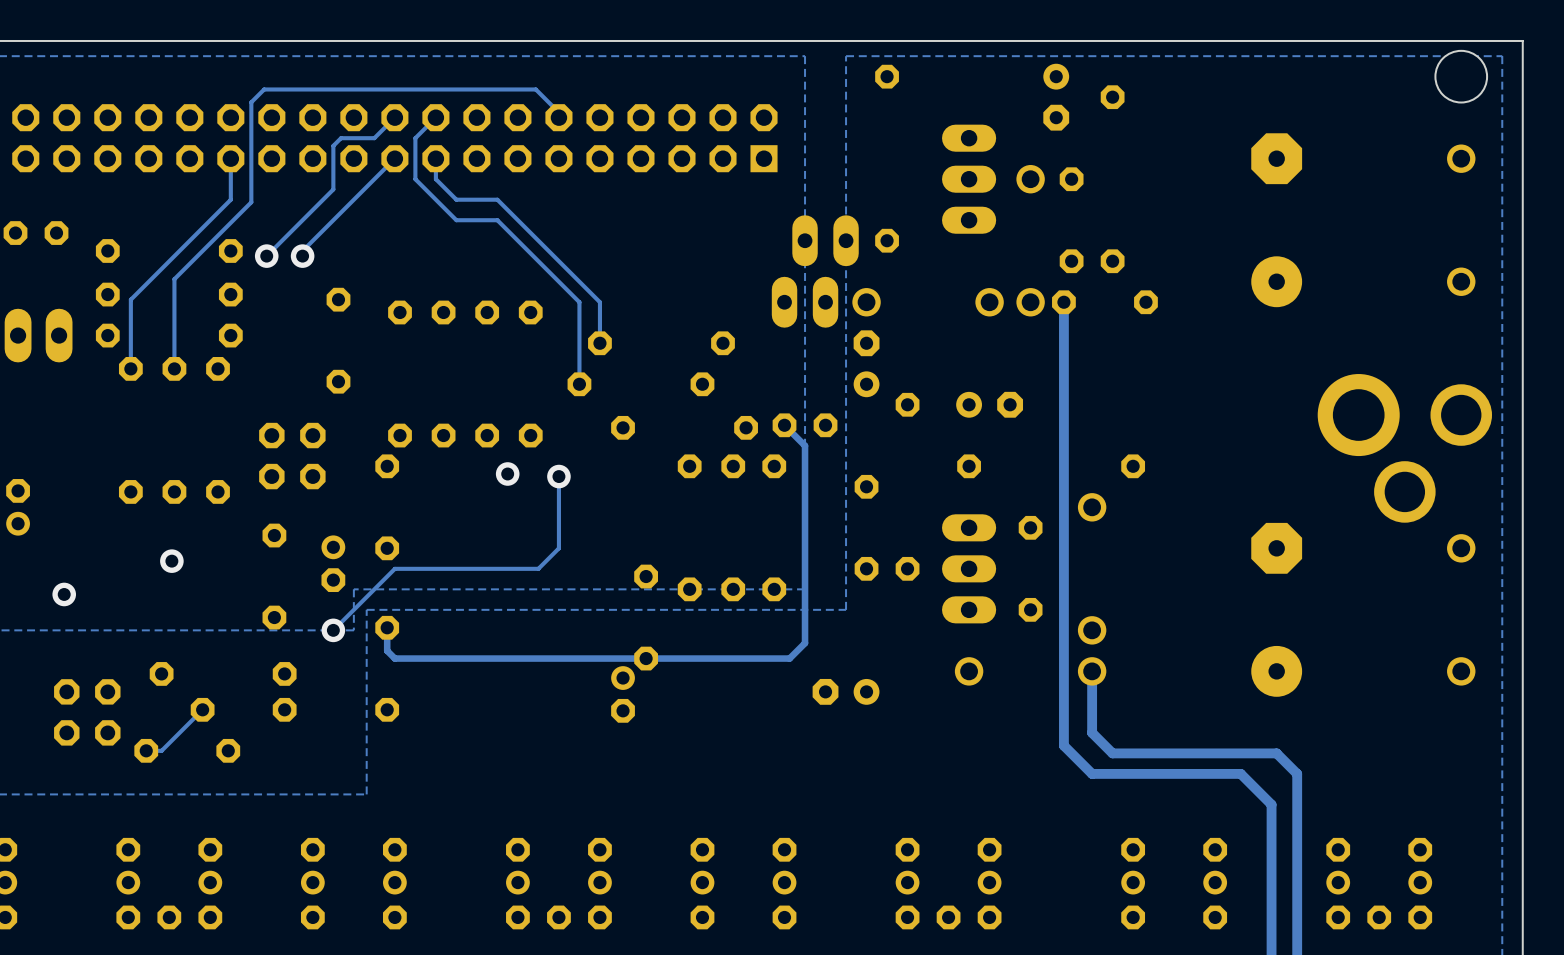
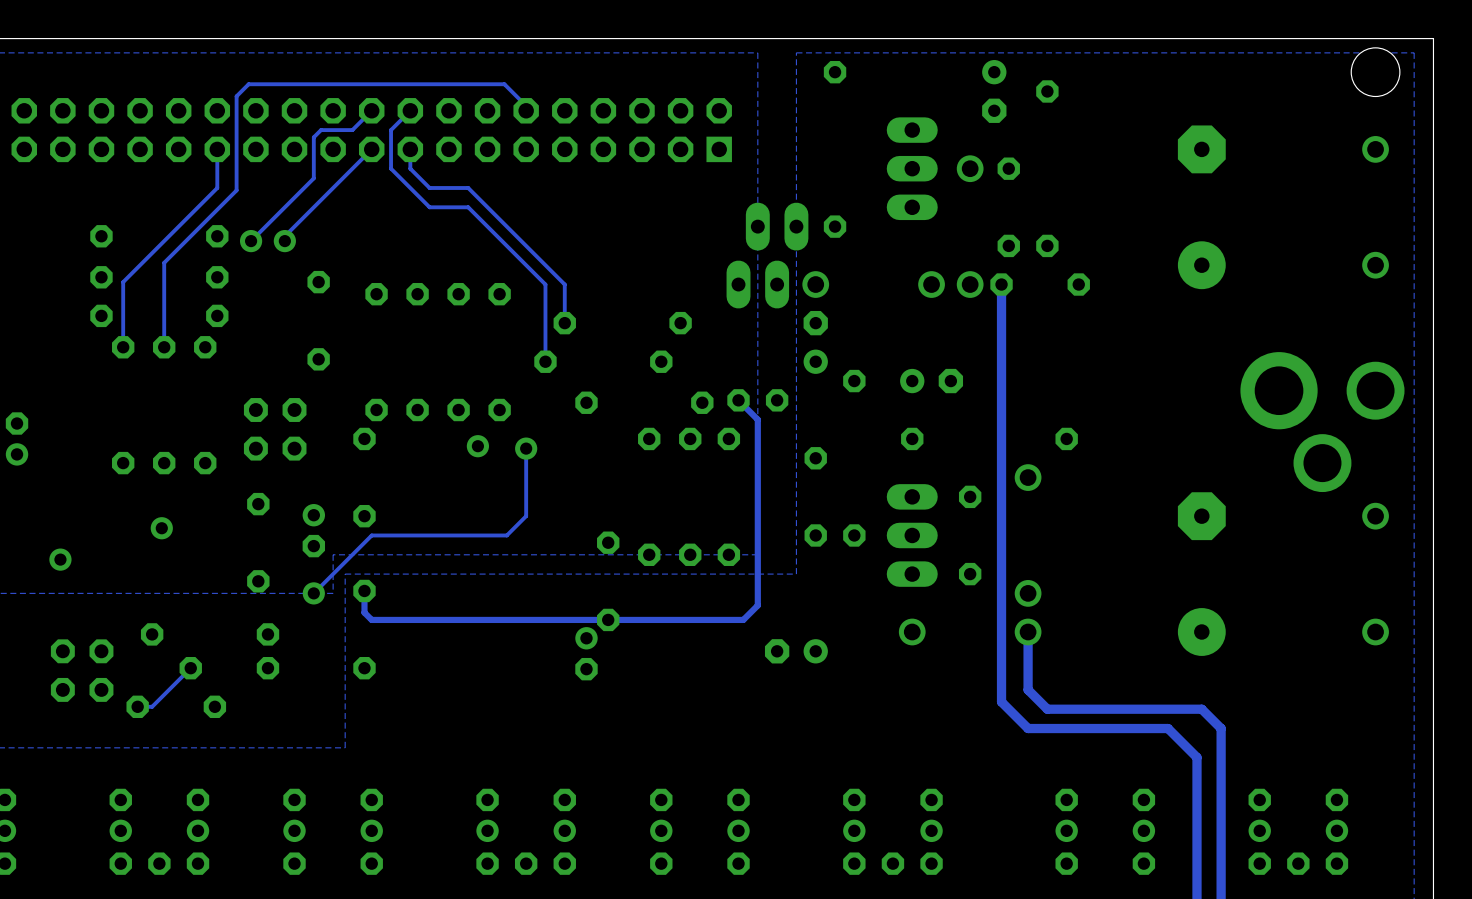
part: (36, 233) -> none
part: (38, 335) -> none
part position: (18, 507) -> (17, 438)

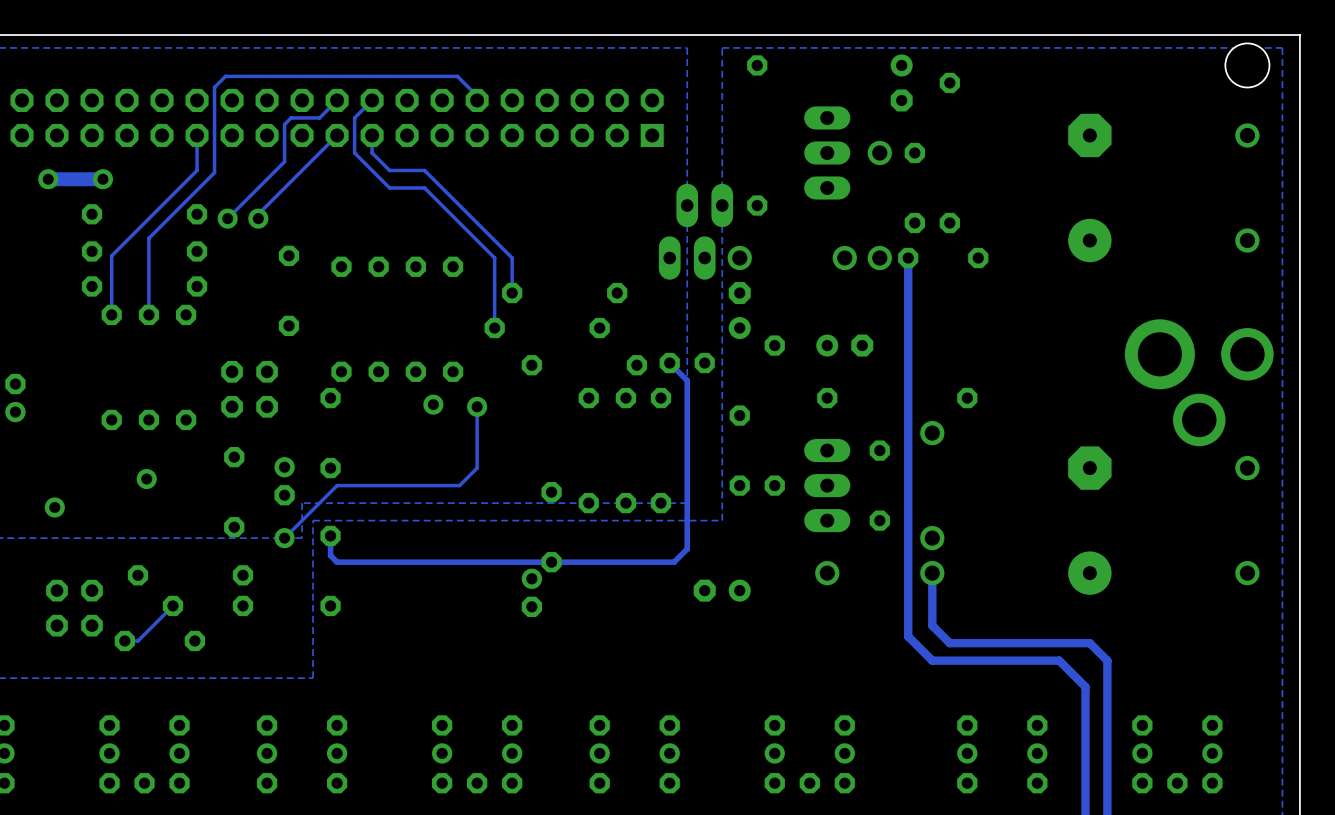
via: none -> (48, 179)
track: none -> (102, 179) (48, 179)
via: none -> (102, 179)

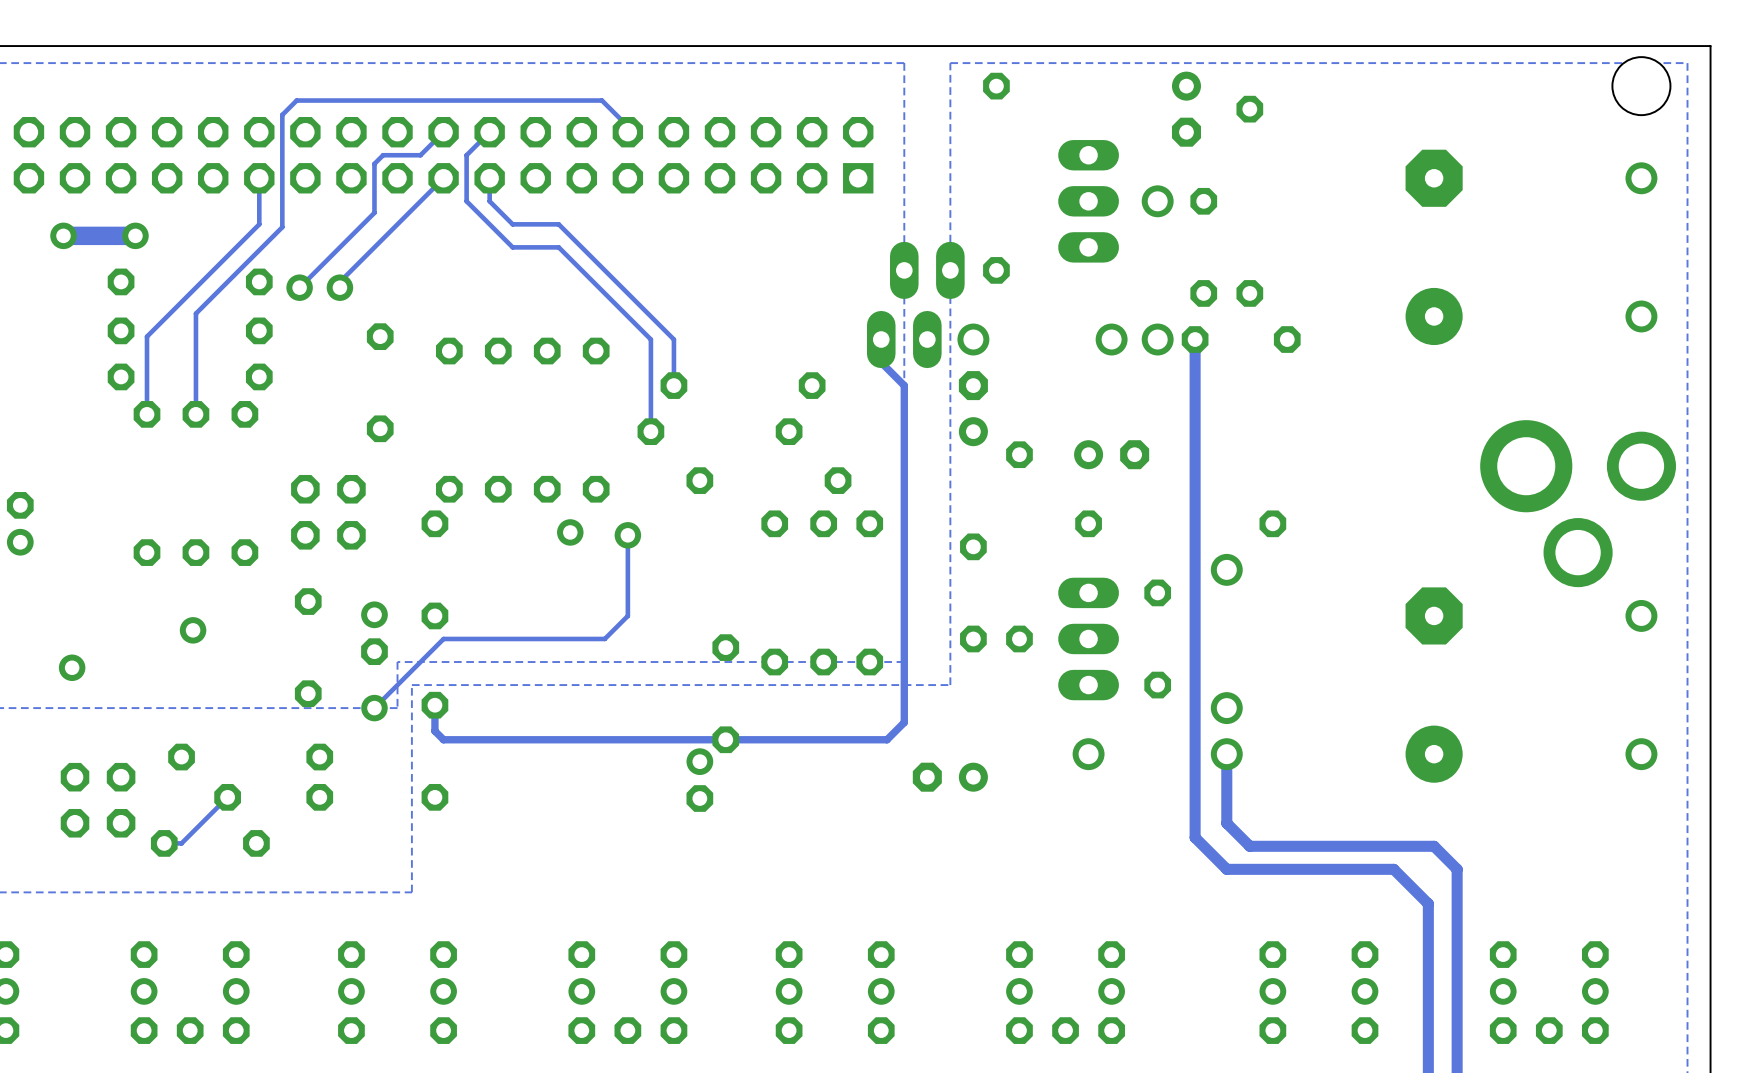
track: (669, 363) (687, 380) -> (881, 339) (881, 362) (904, 385) (904, 500)
part: (687, 363) -> none

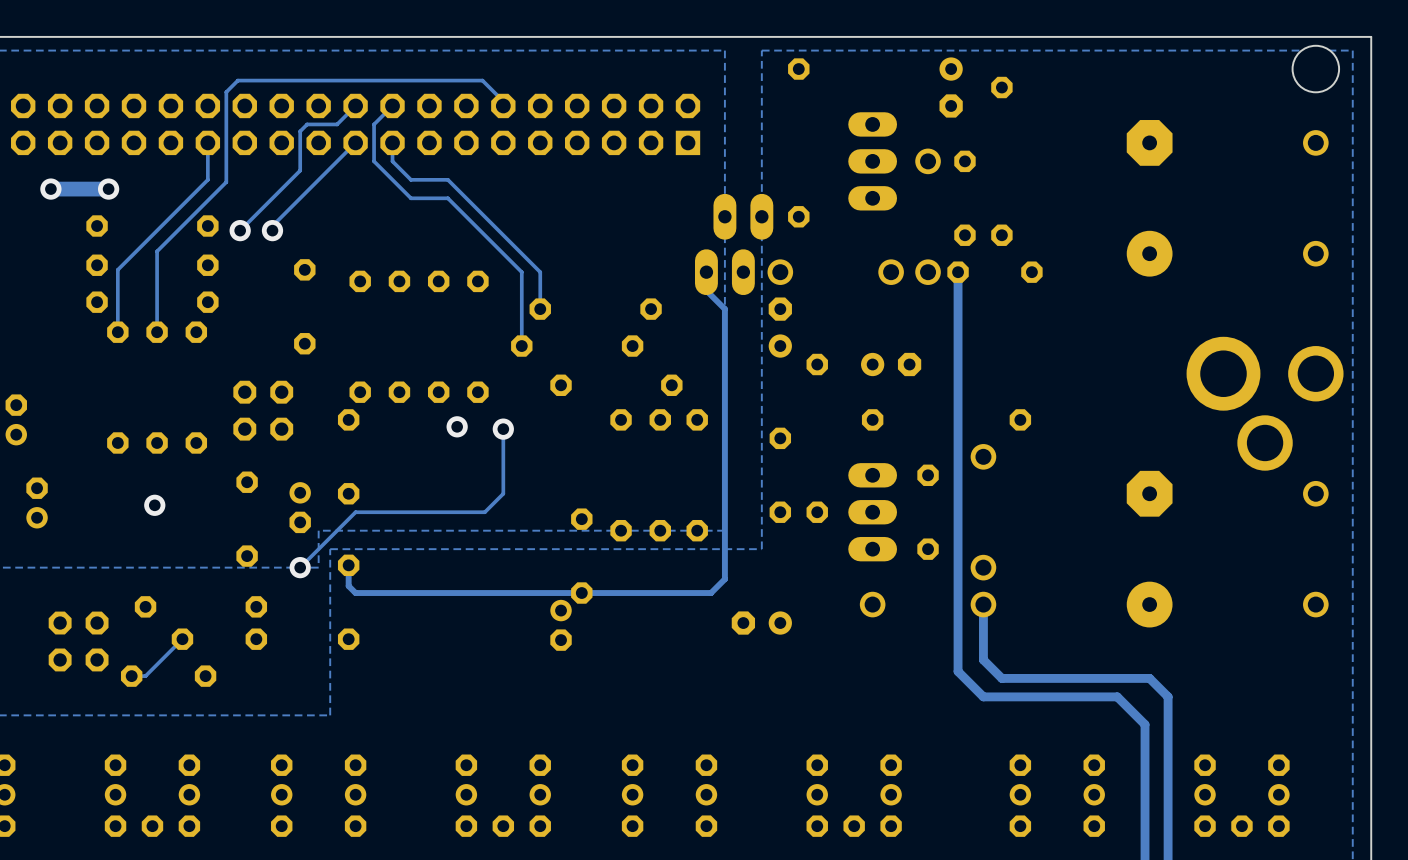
part: none -> (37, 503)
via: (72, 667) -> none

